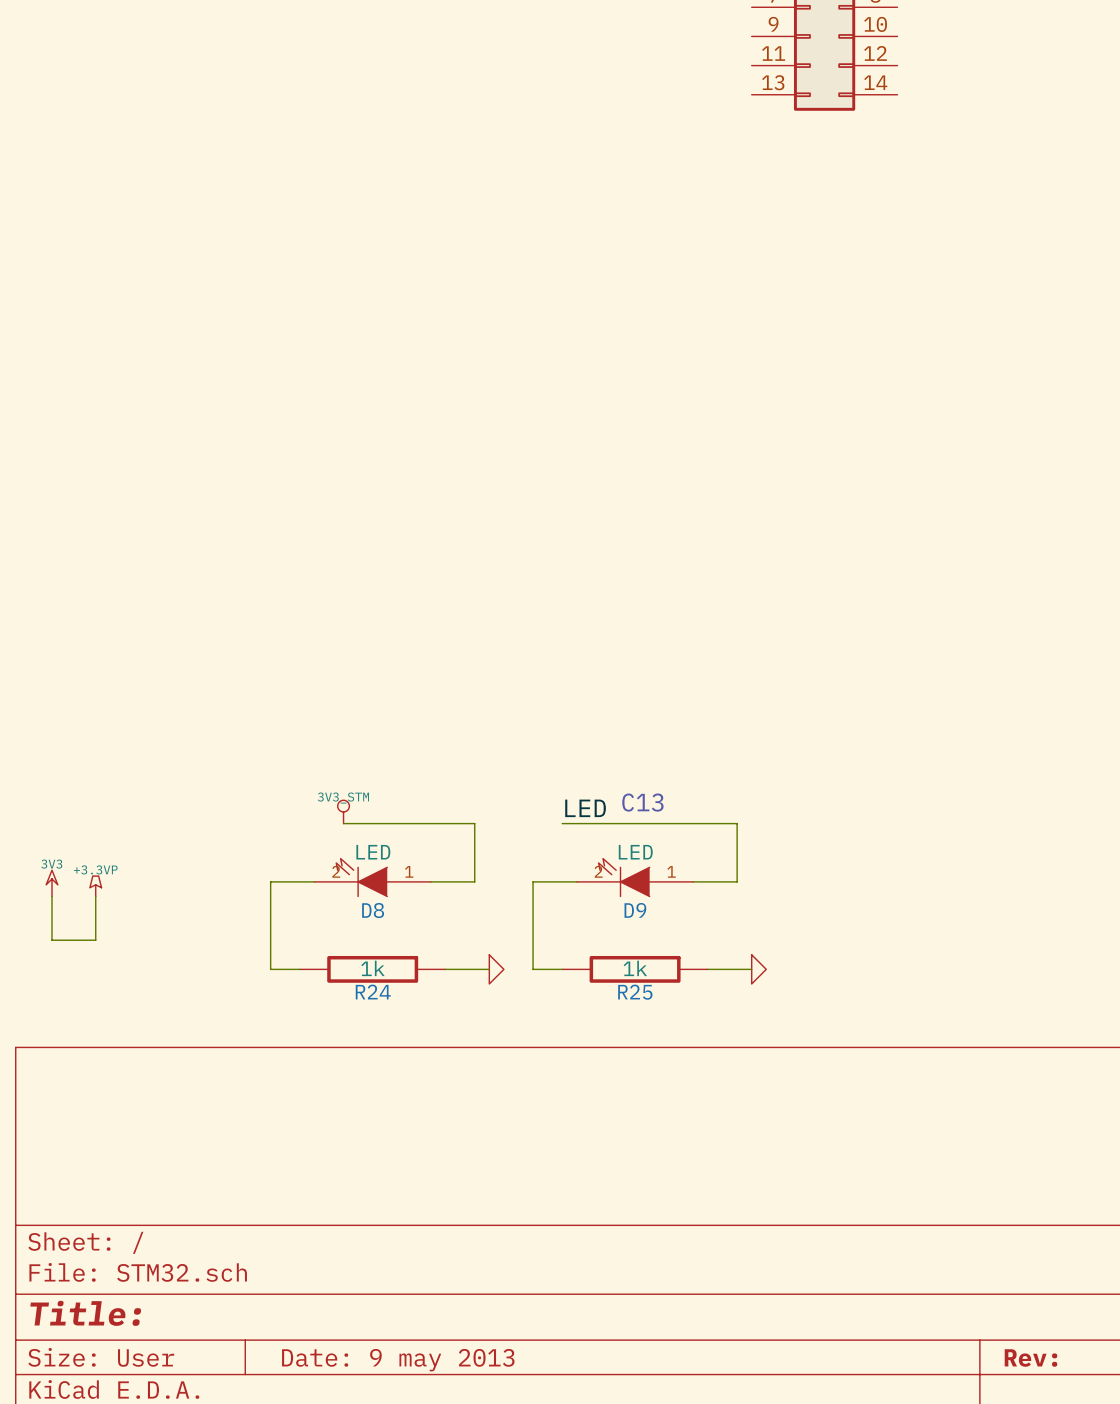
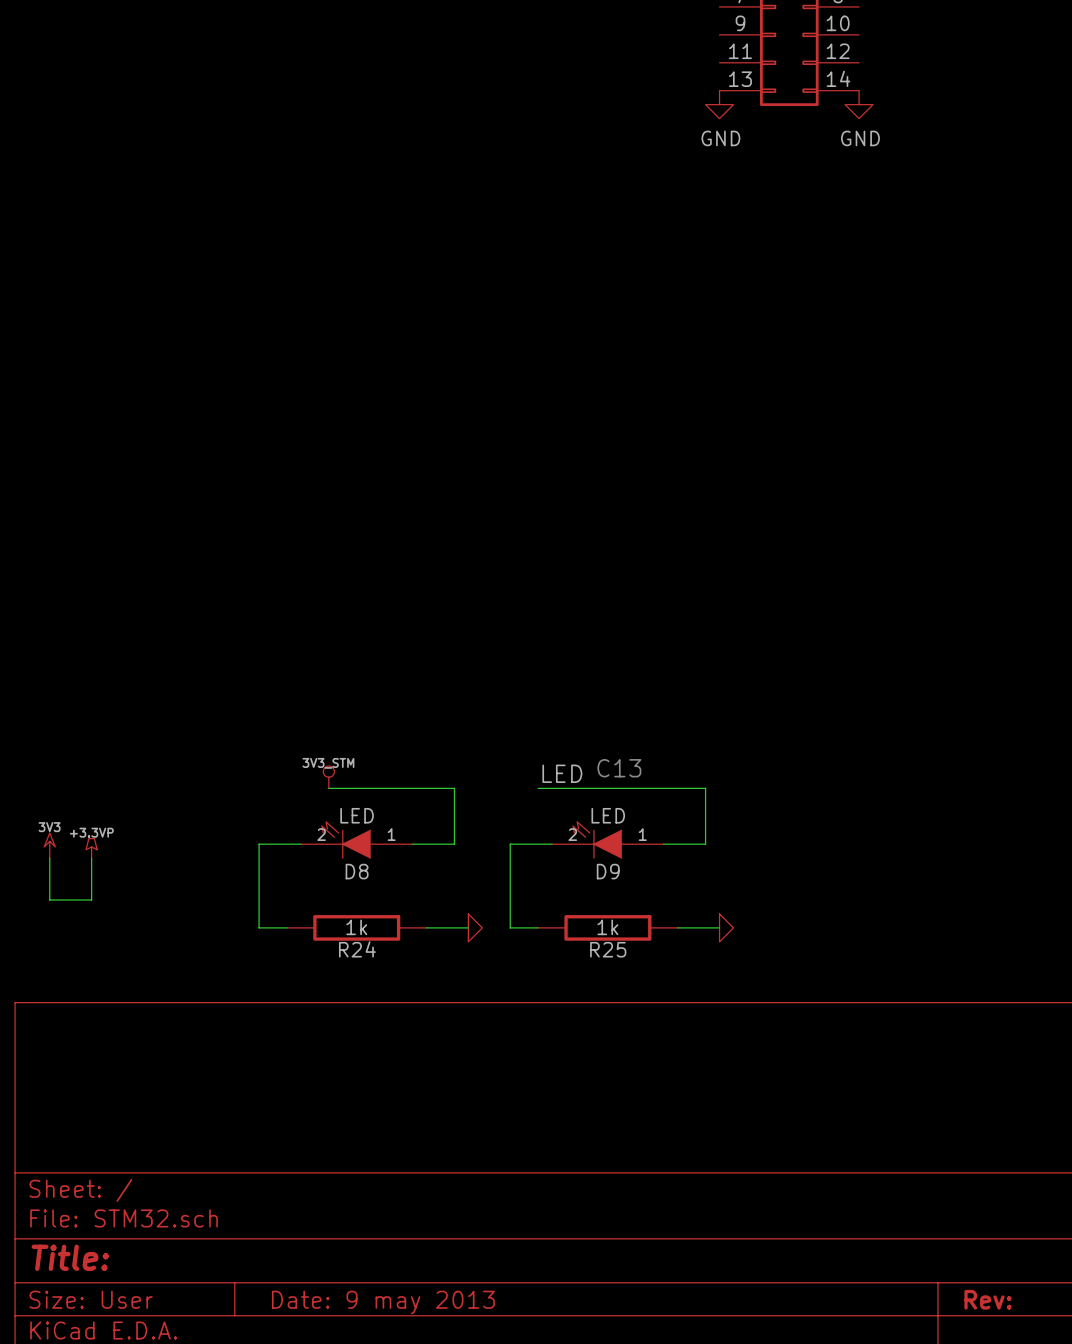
power symbol: none -> GND (719, 104)
power symbol: none -> GND (859, 104)

